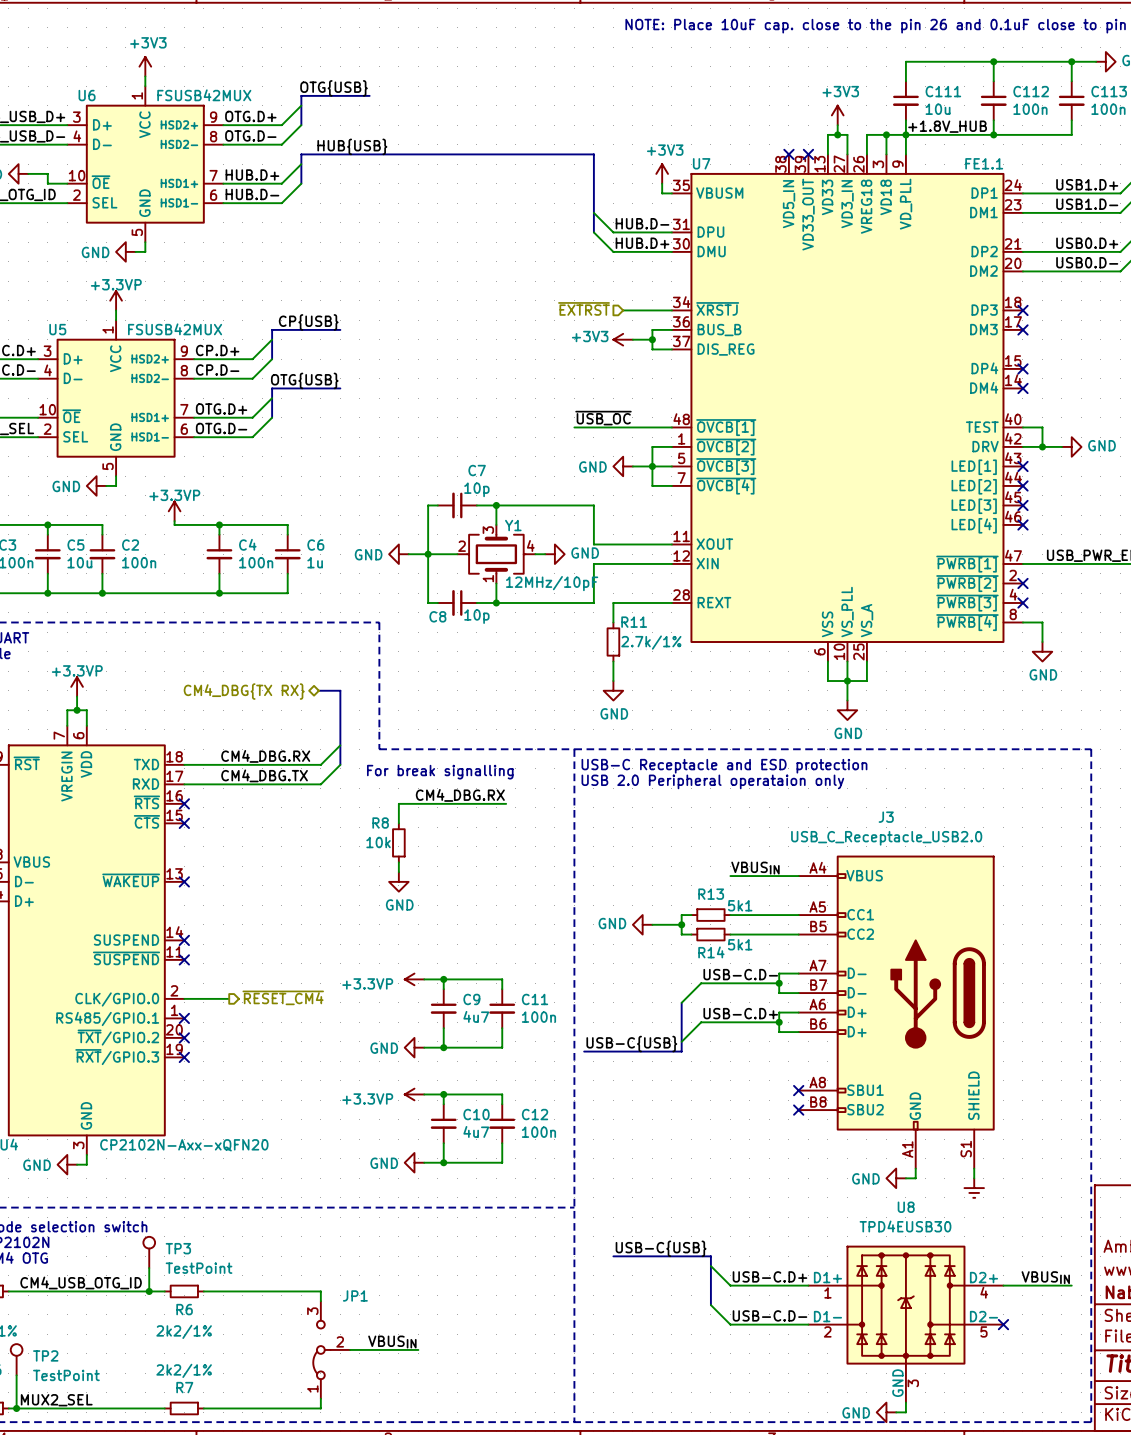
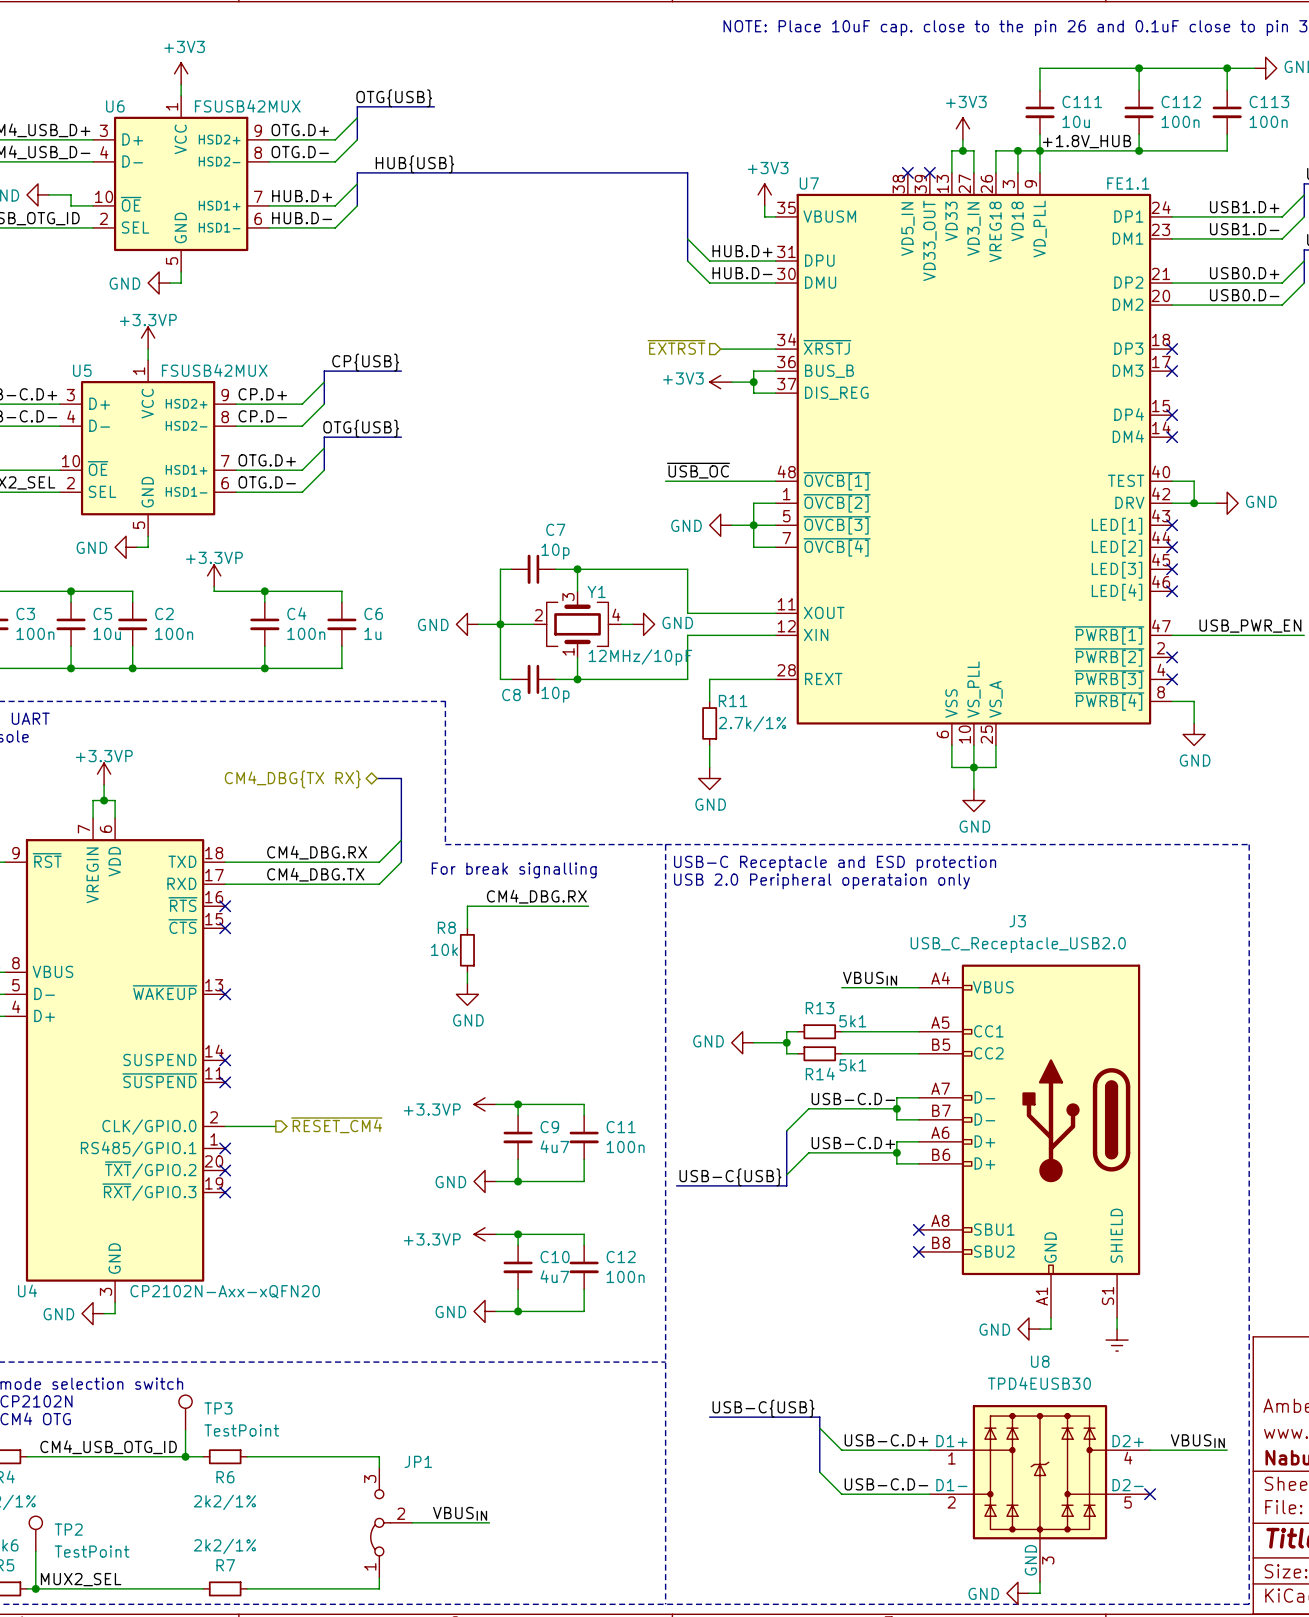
label: HUB.D- (642, 223) -> HUB.D+ (742, 251)
label: HUB.D+ (642, 243) -> HUB.D- (742, 273)

